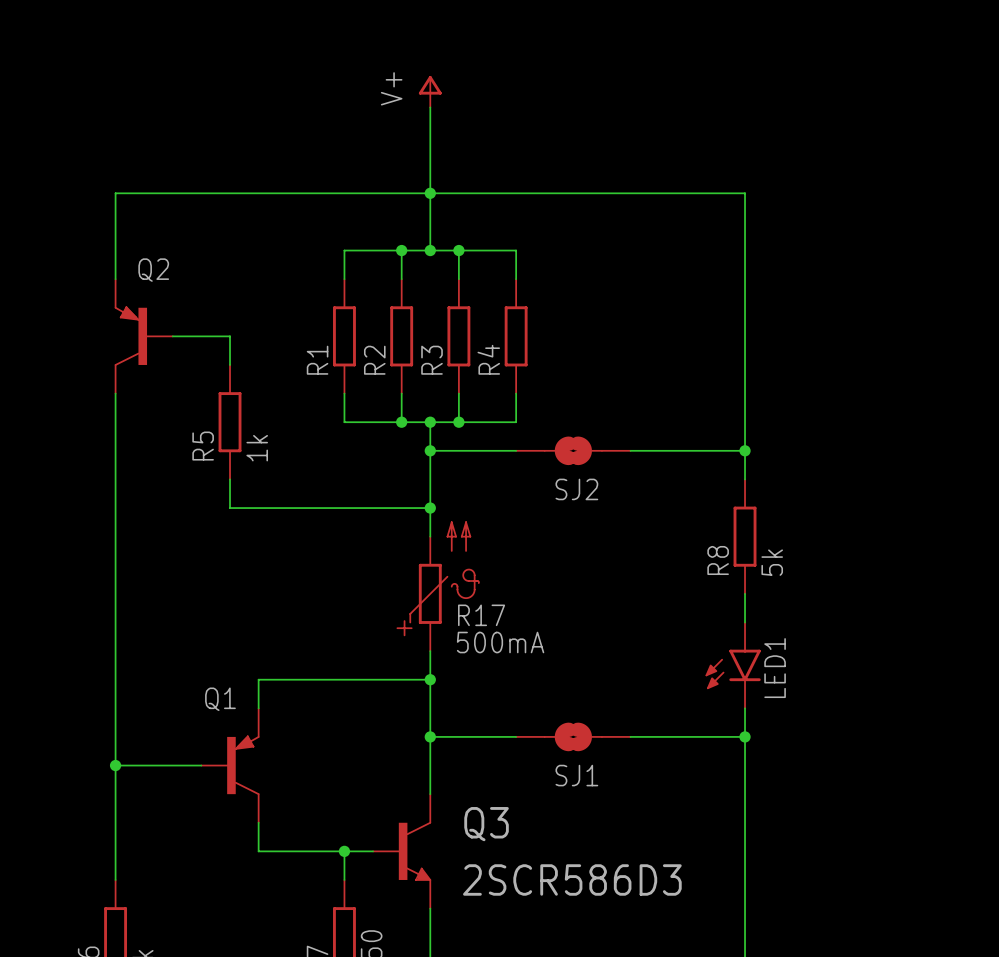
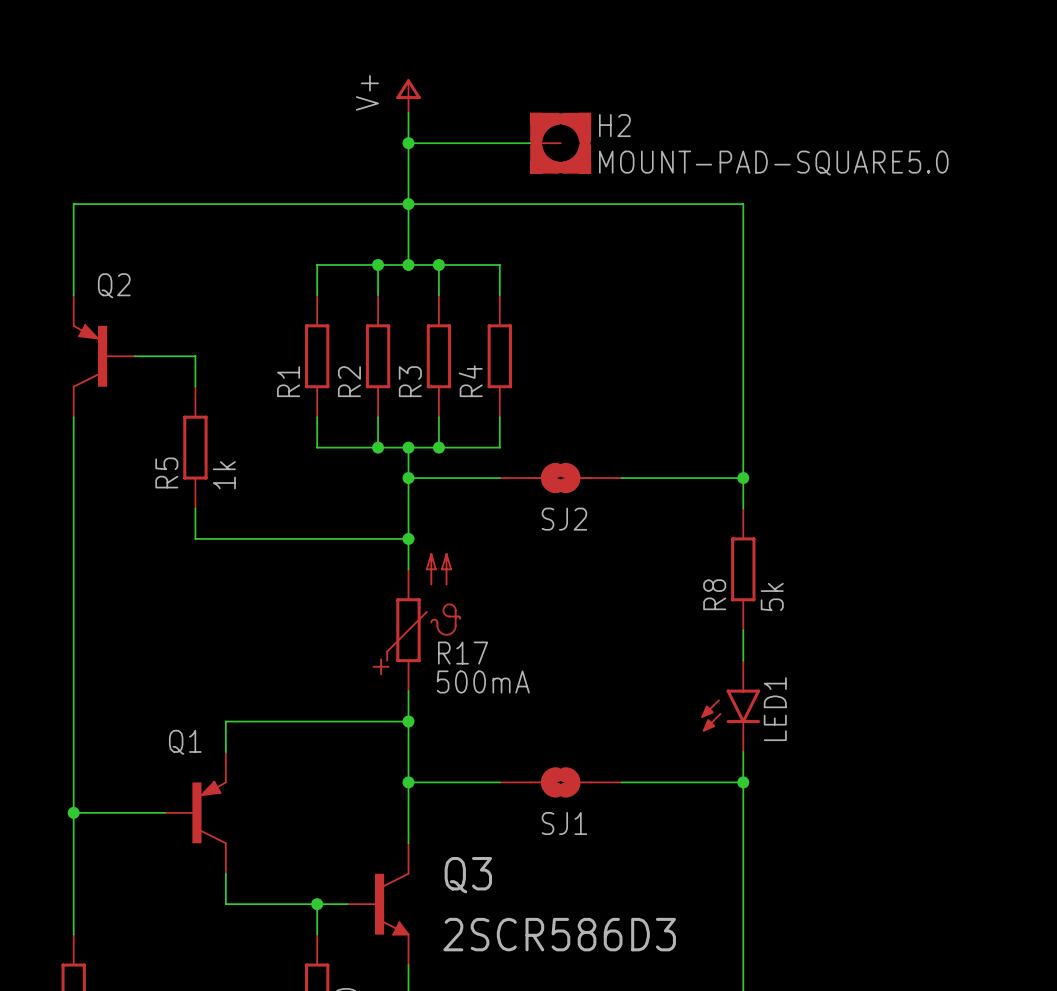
wire: none -> (408, 143) (530, 143)
junction: none -> (408, 143)
H2: none -> MOUNT-PAD-SQUARE5.0 (560, 143)

